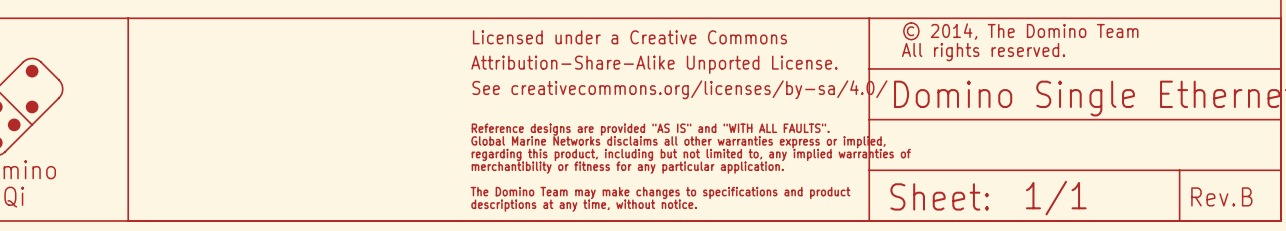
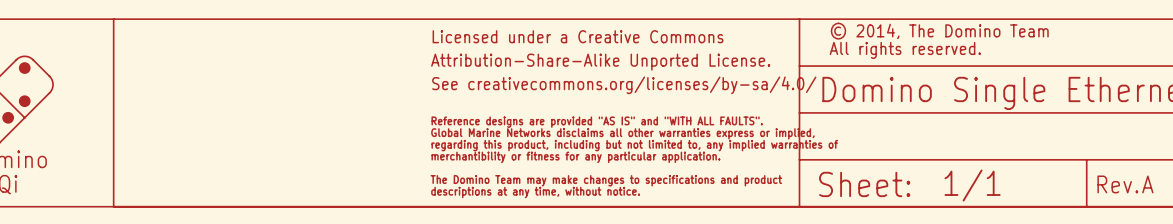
text: B (1247, 196) -> A (1147, 184)

